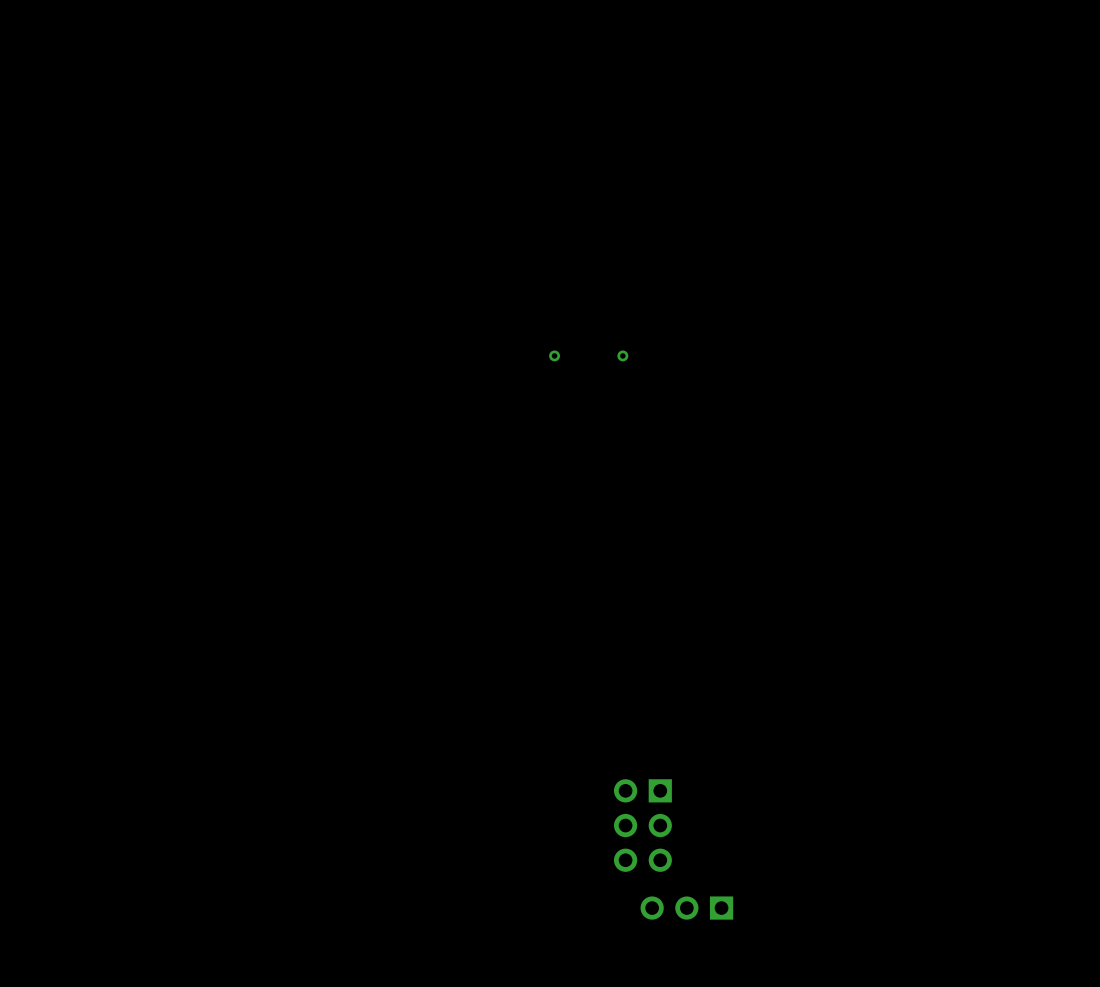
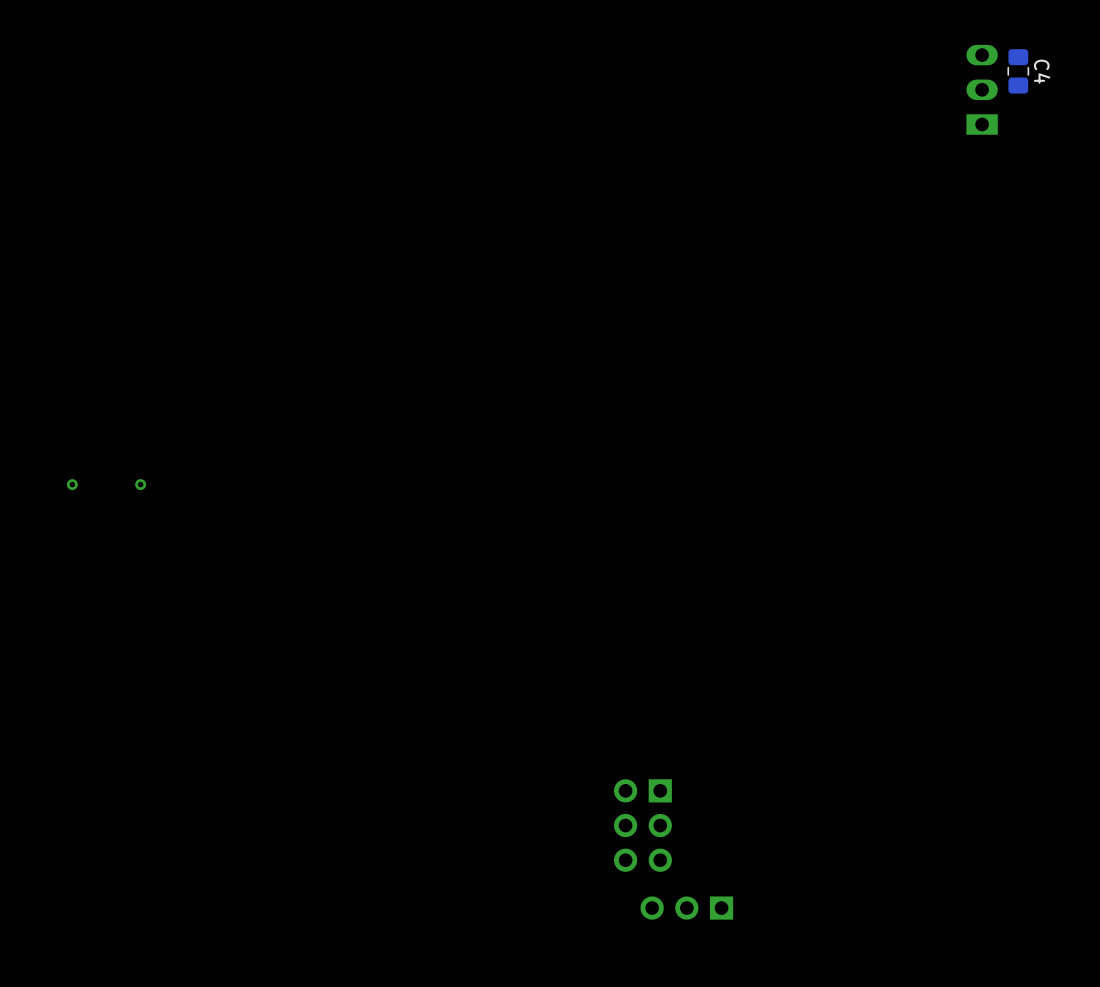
C4: none -> (1018, 71)
part: none -> (982, 89)
via: (554, 355) -> none
via: (622, 355) -> none
via: none -> (72, 484)
via: none -> (140, 484)

